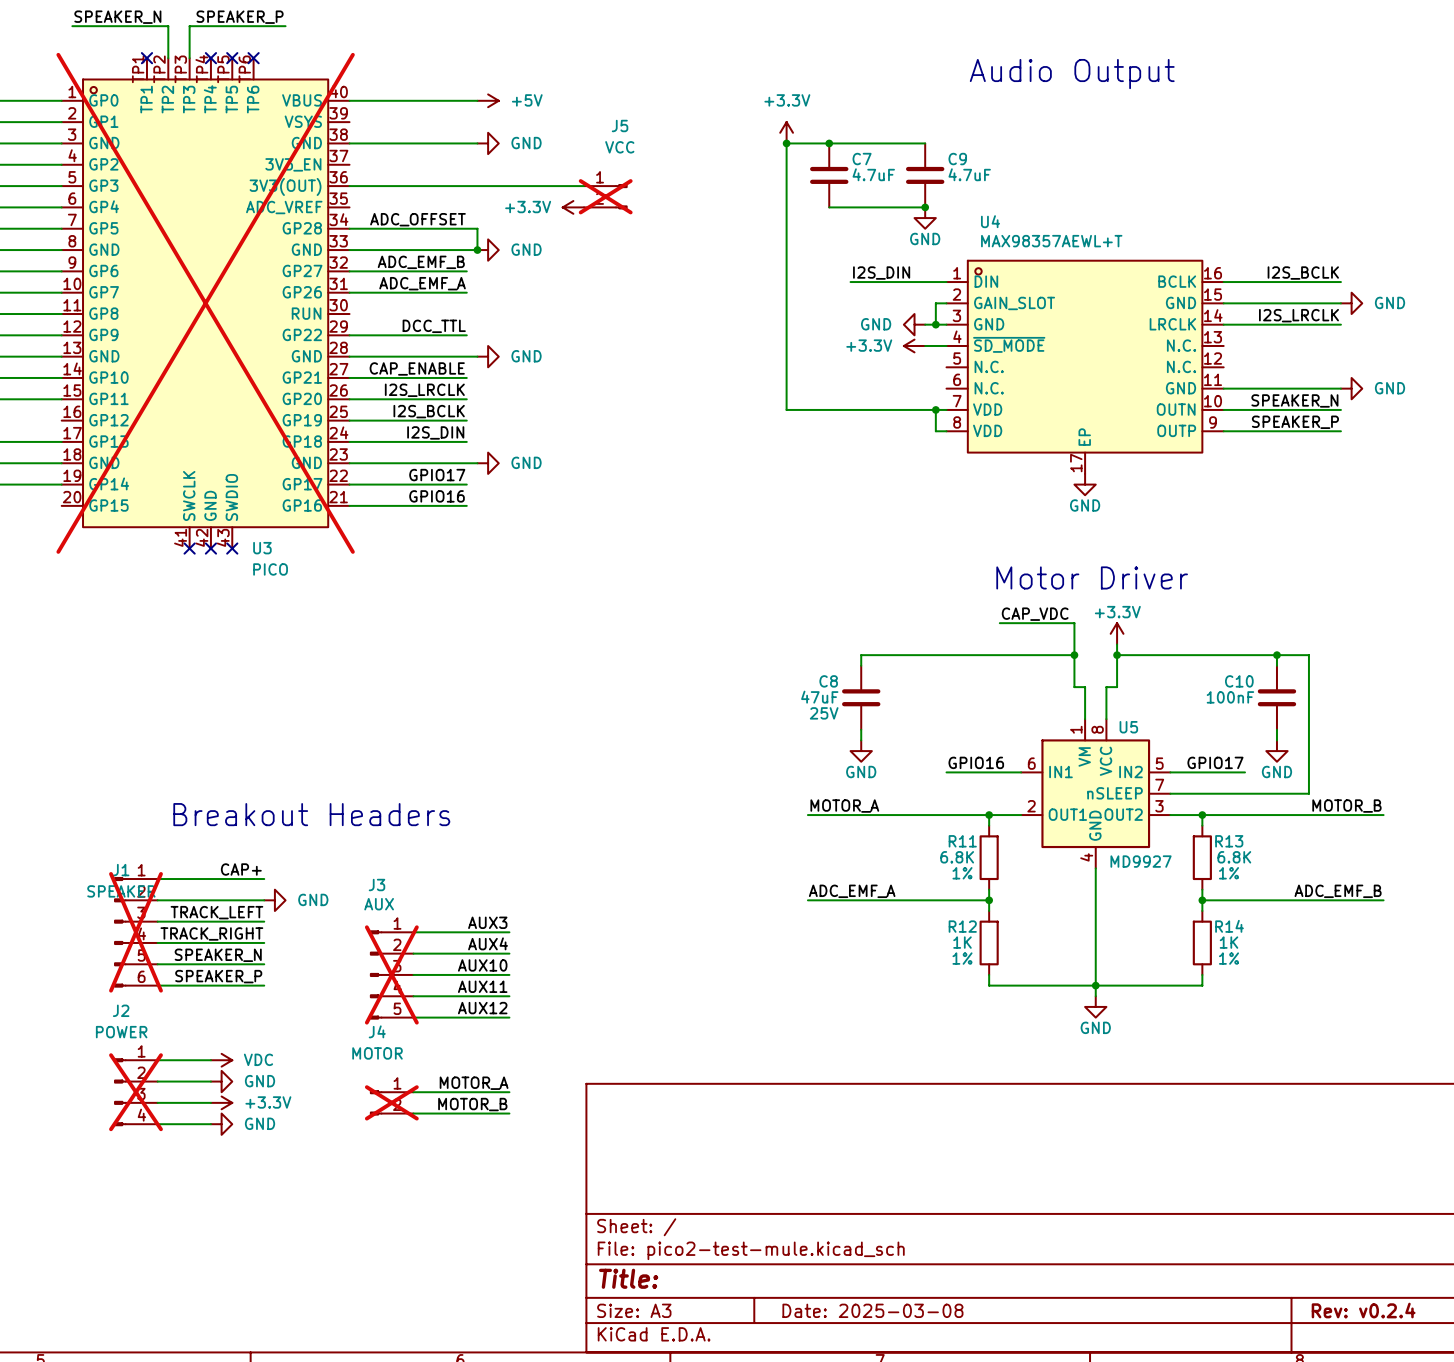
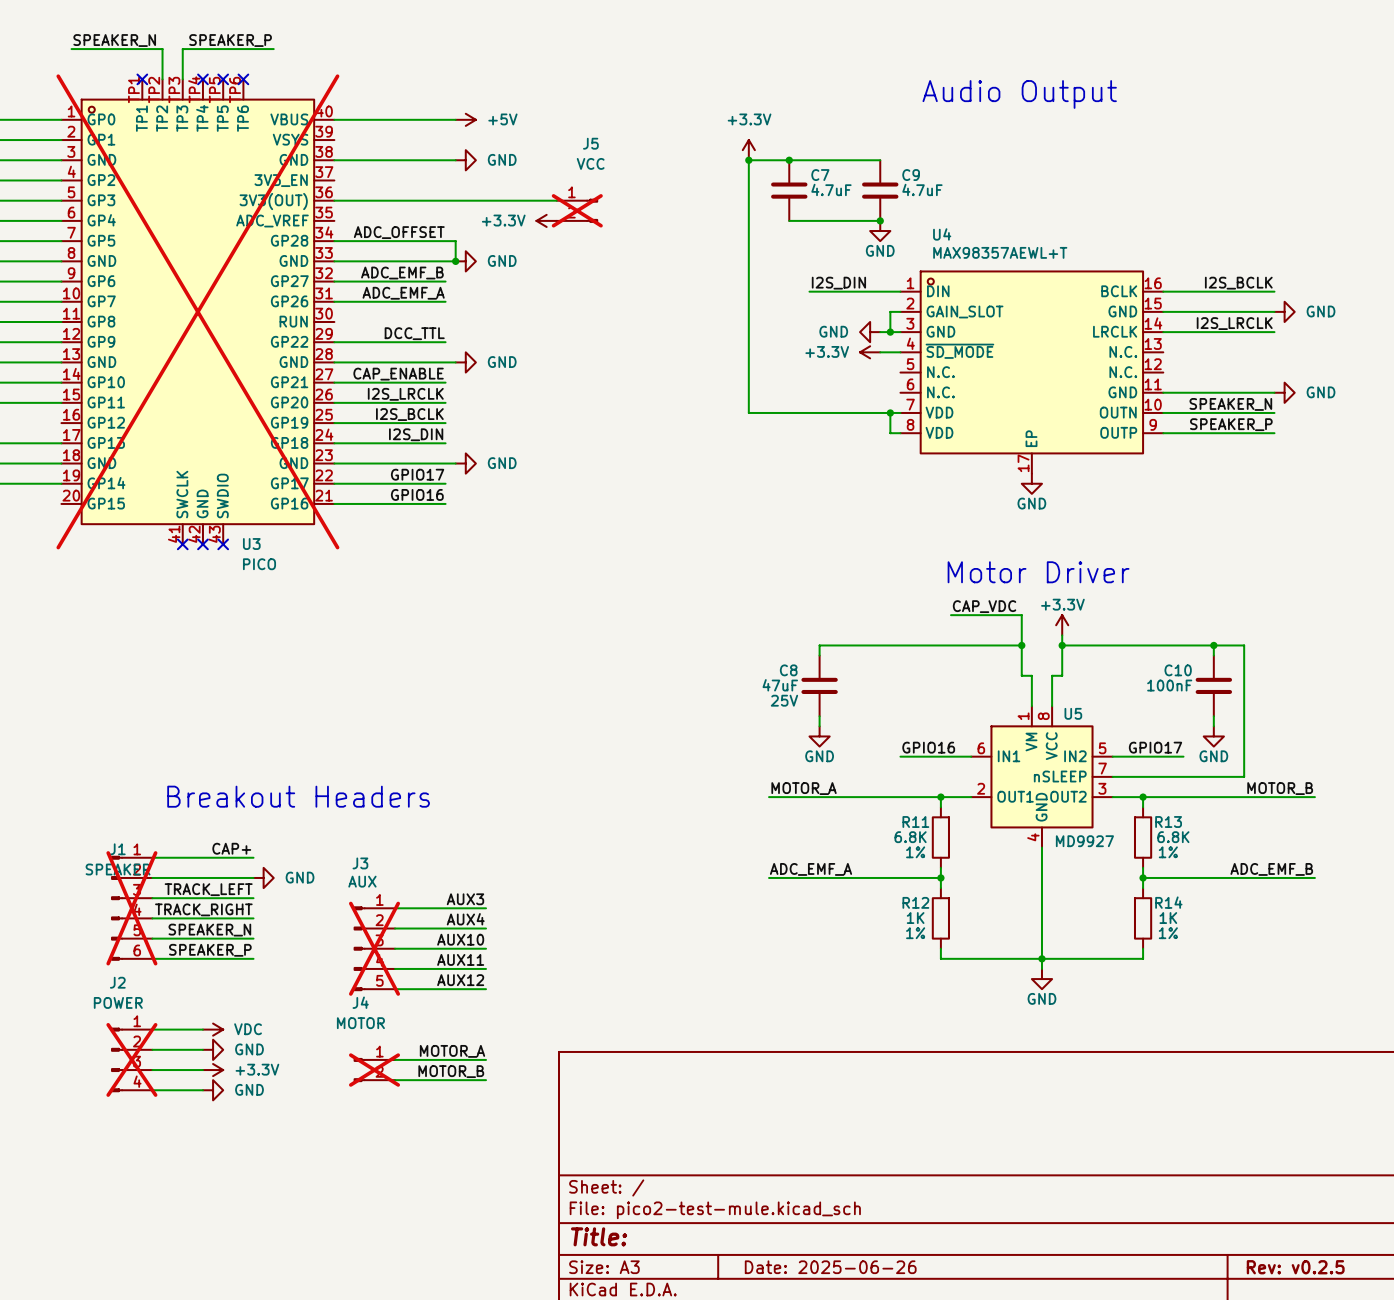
title block: Date: 2025-03-08 (872, 1310) -> Date: 2025-06-26 (830, 1267)
title block: Rev: v0.2.4 (1363, 1310) -> Rev: v0.2.5 (1295, 1267)

